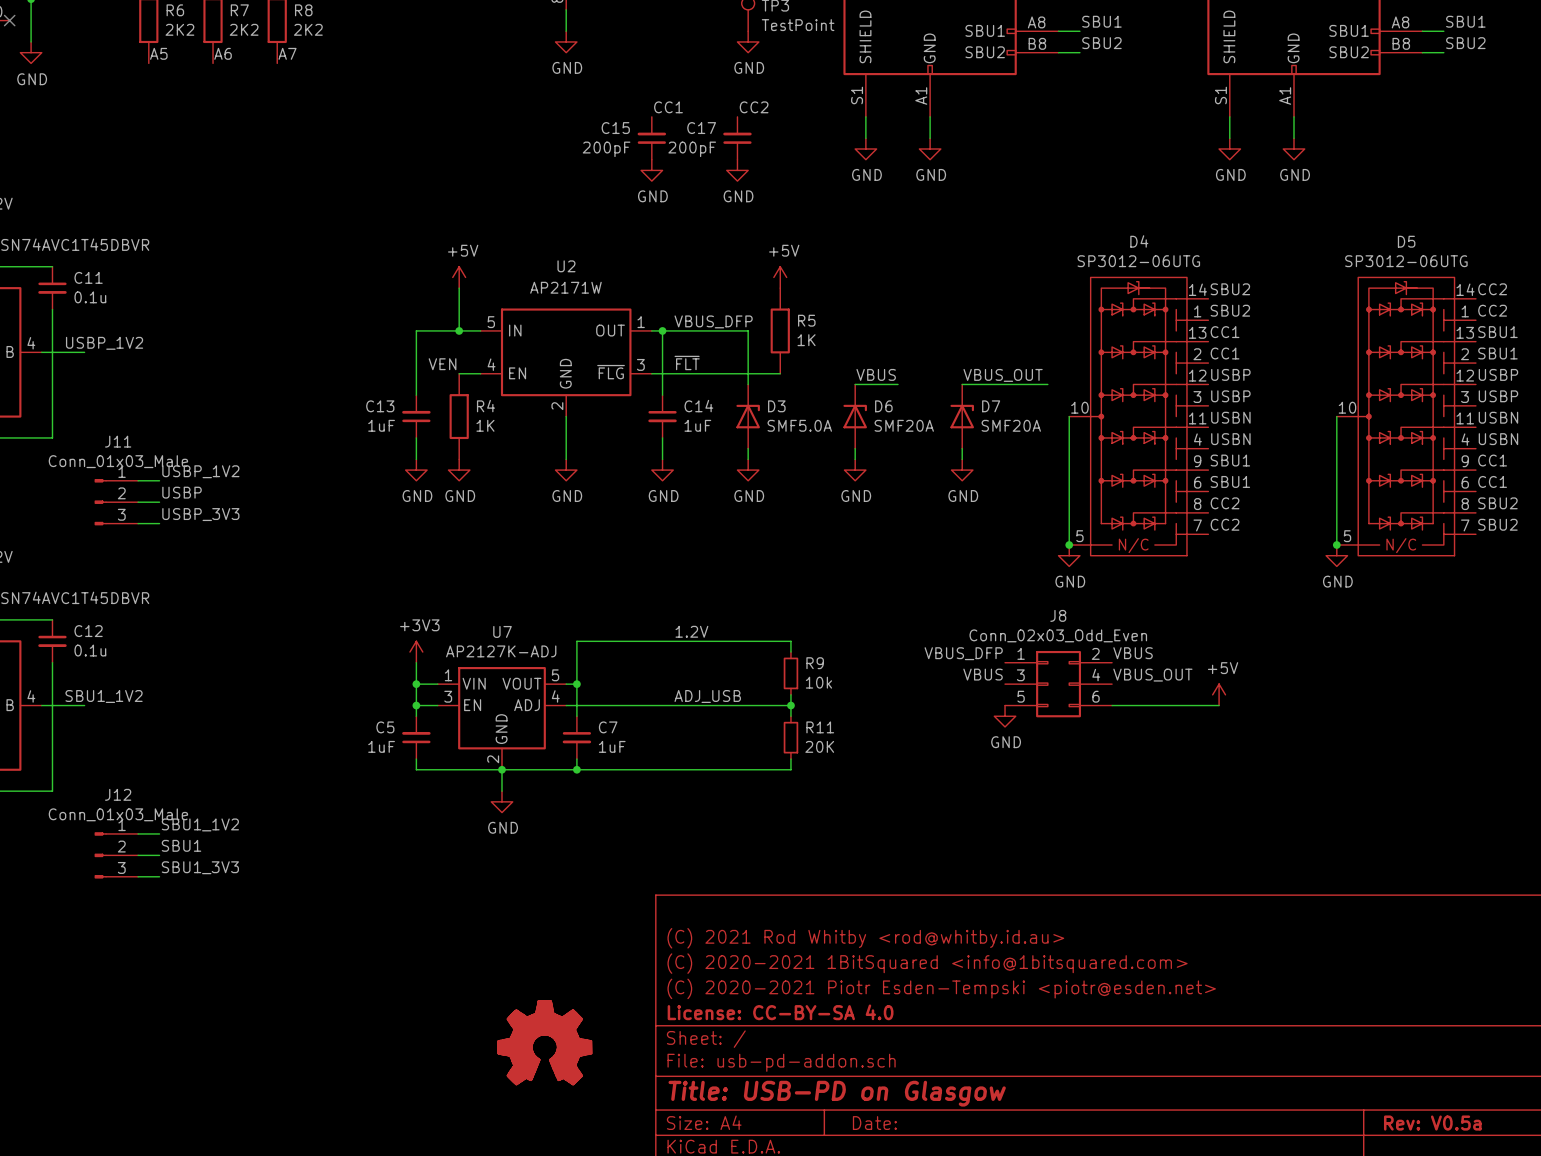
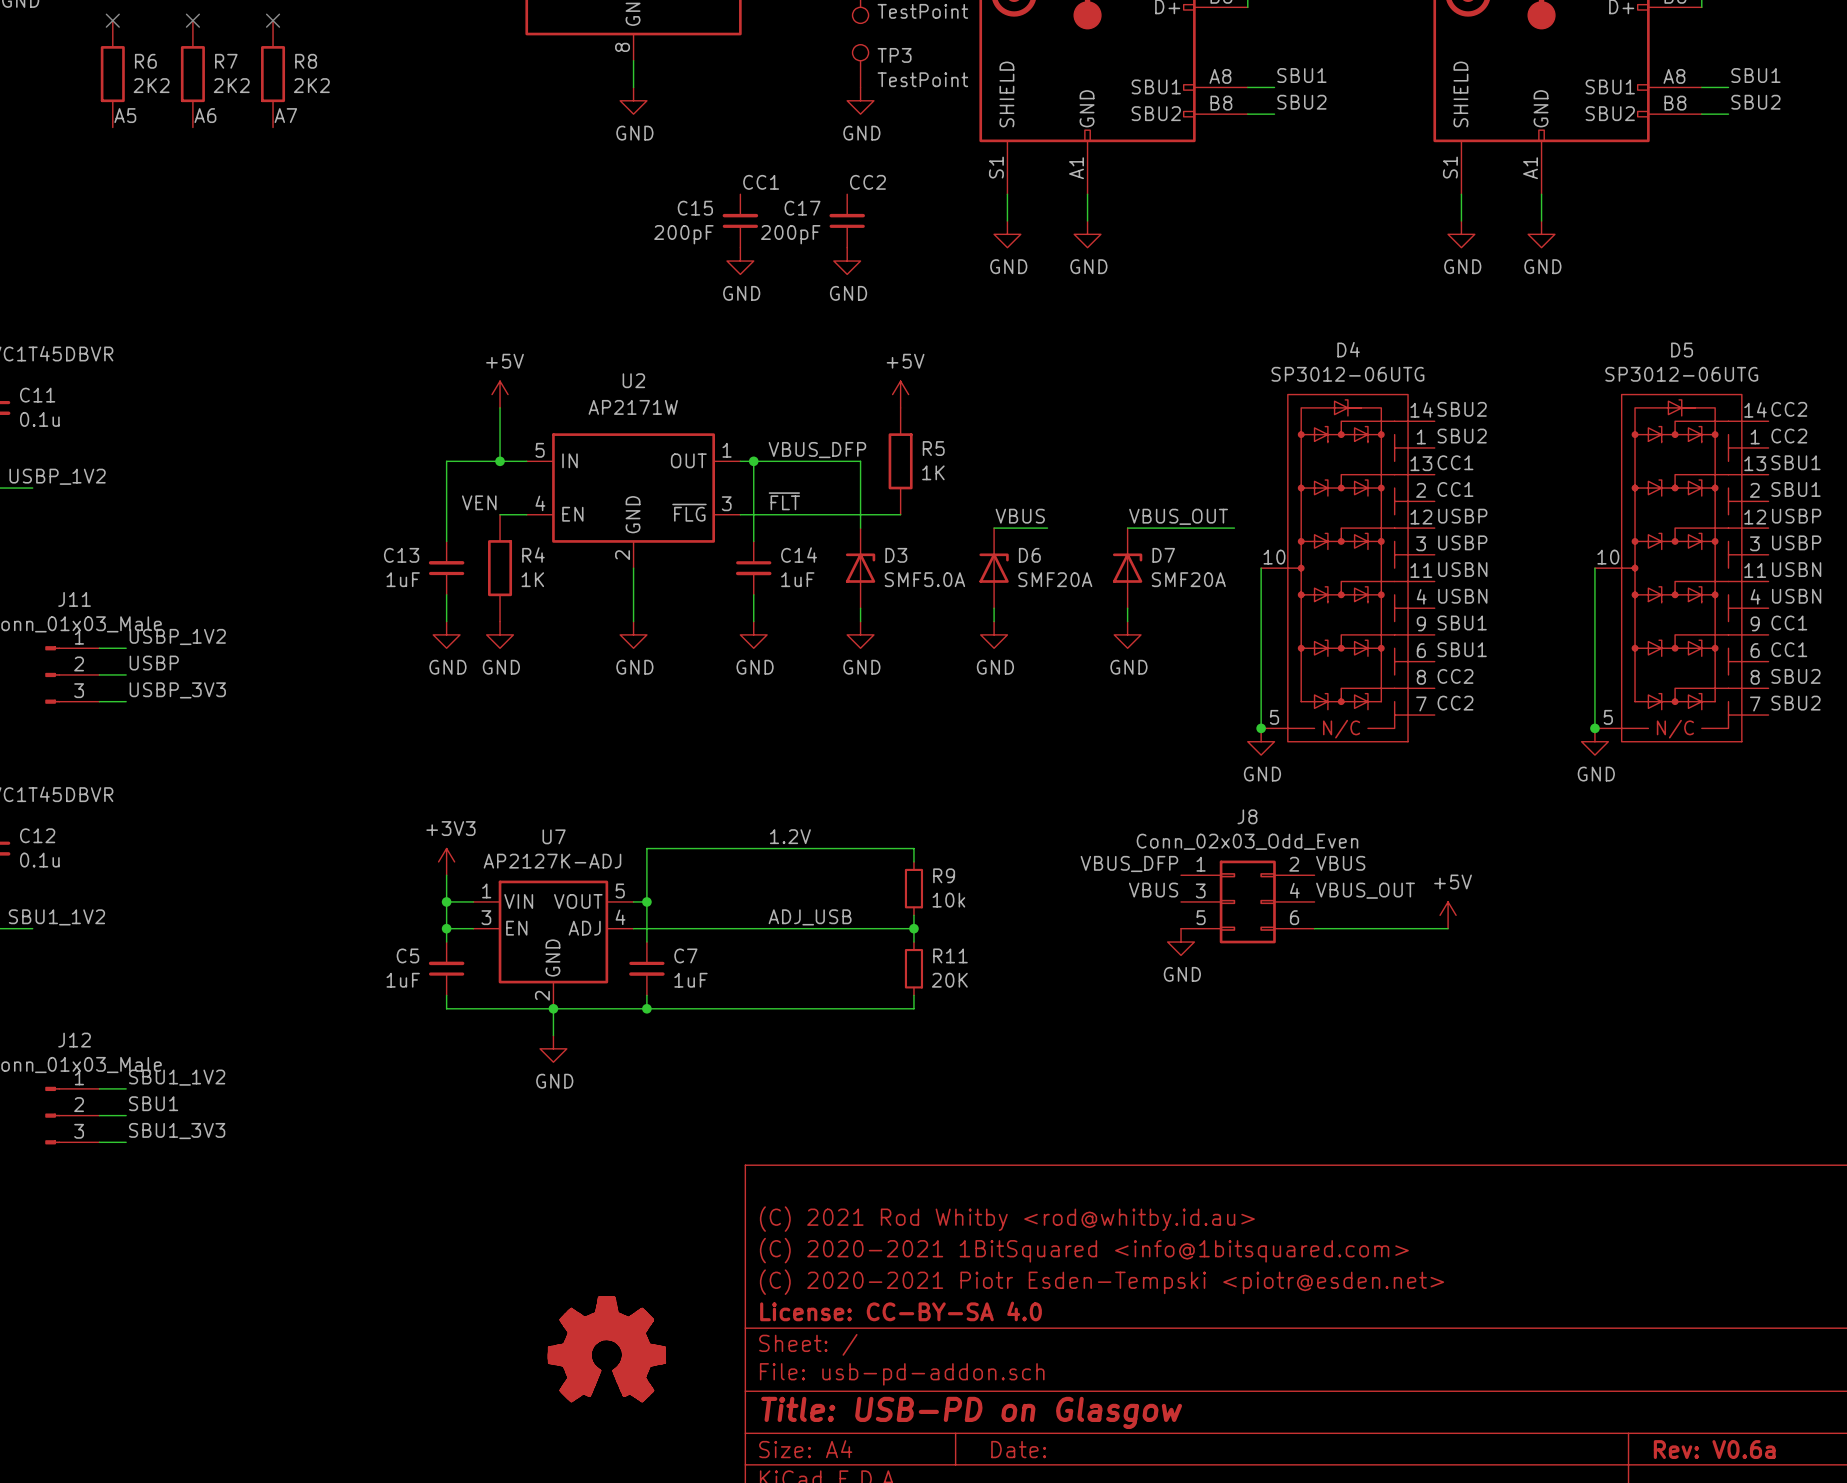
title block: Rev: V0.5a (1432, 1123) -> Rev: V0.6a (1714, 1449)

